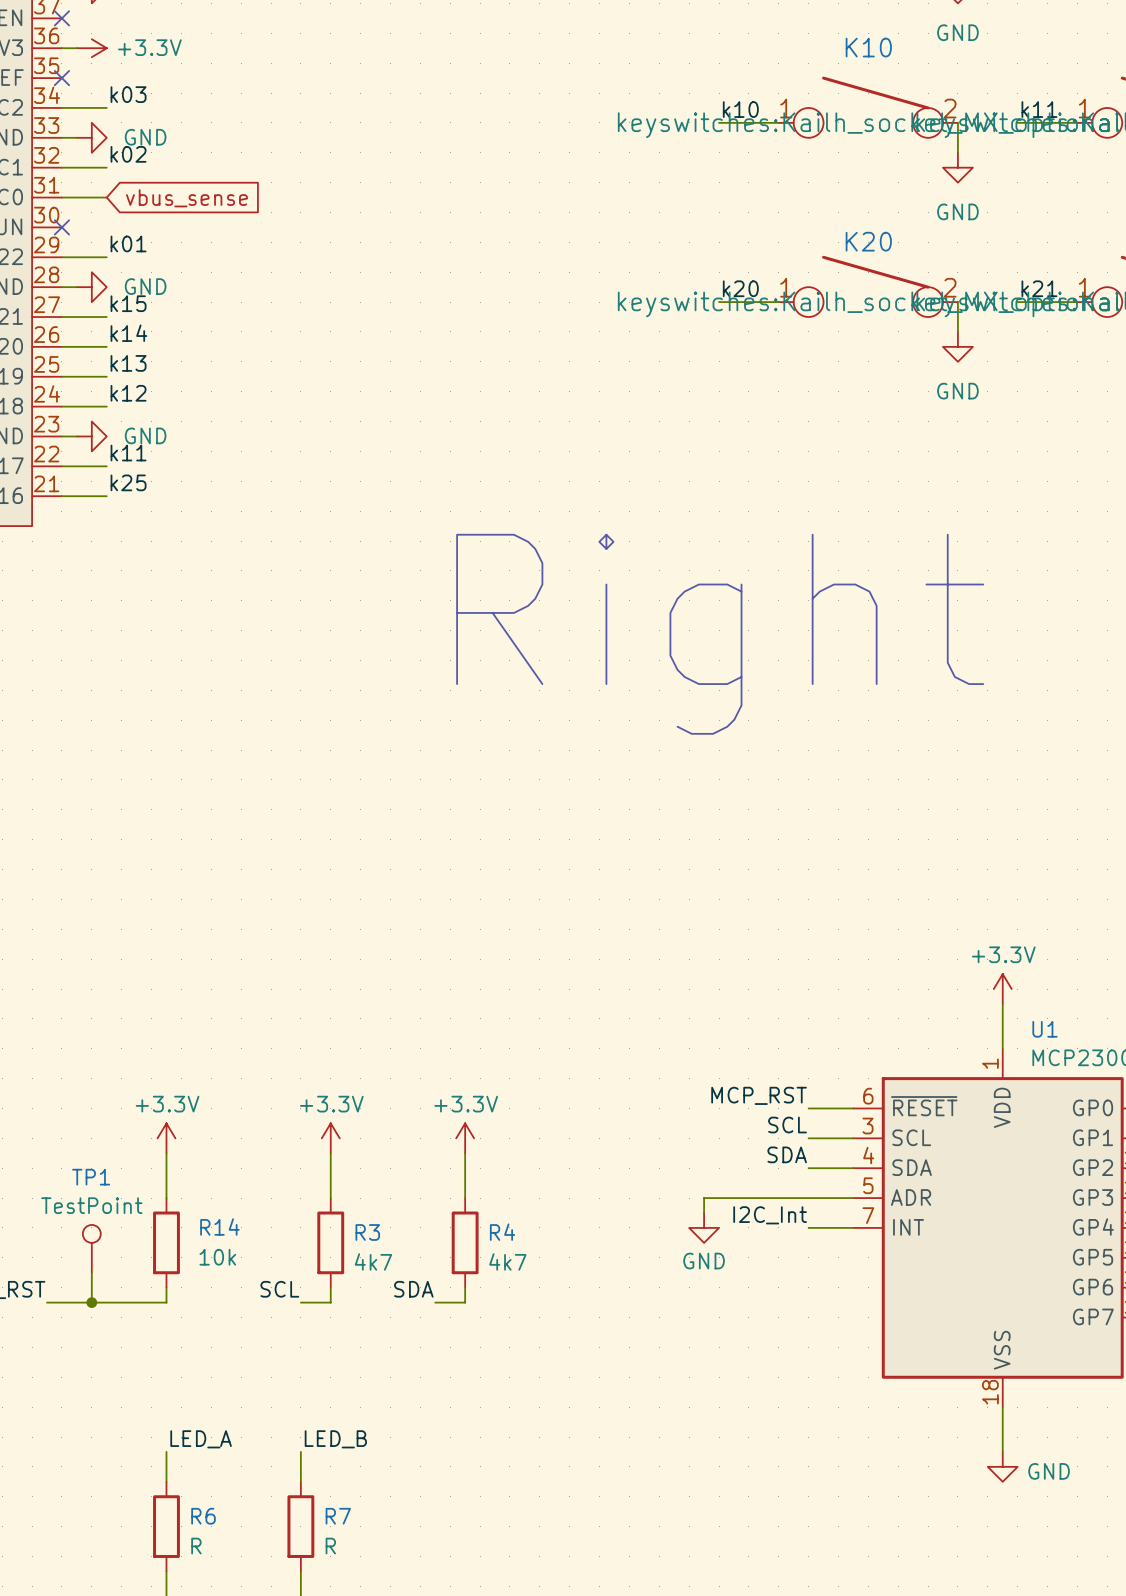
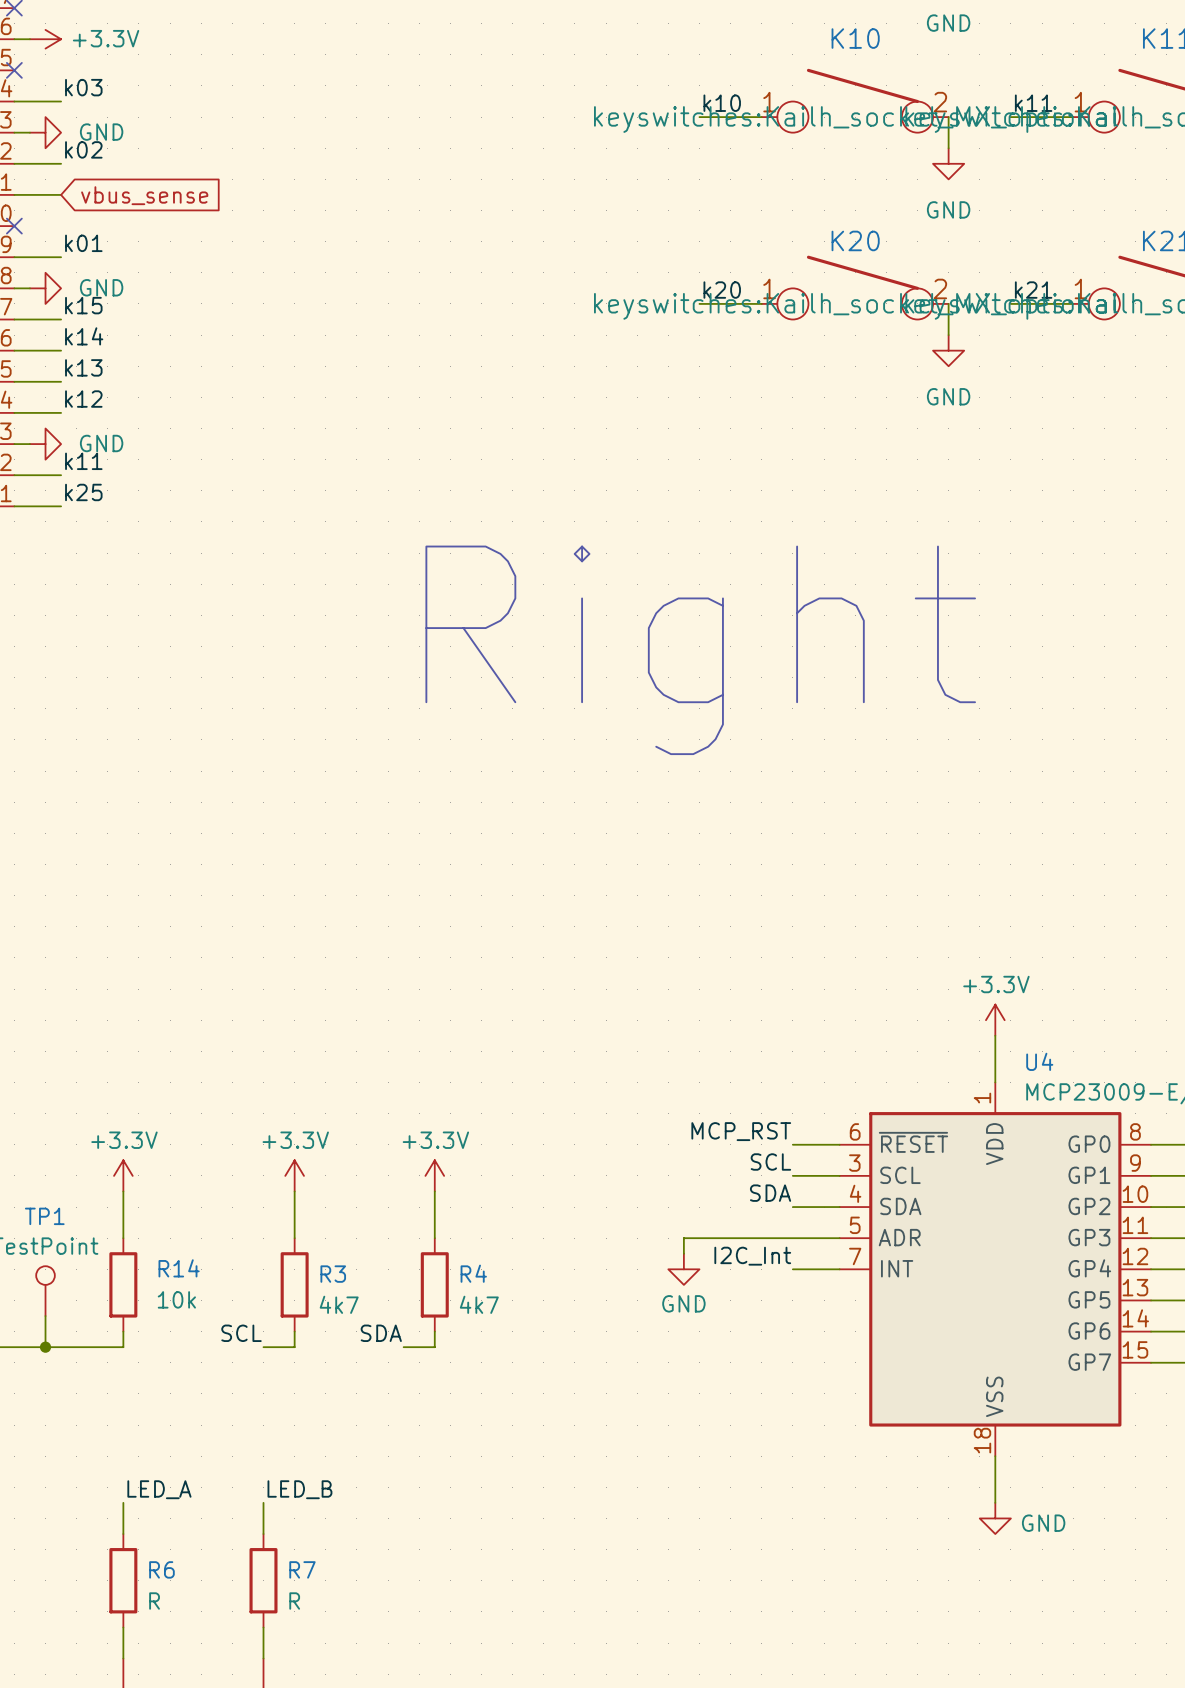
U1 name: U1 (1045, 1029) -> U4 (1039, 1061)

